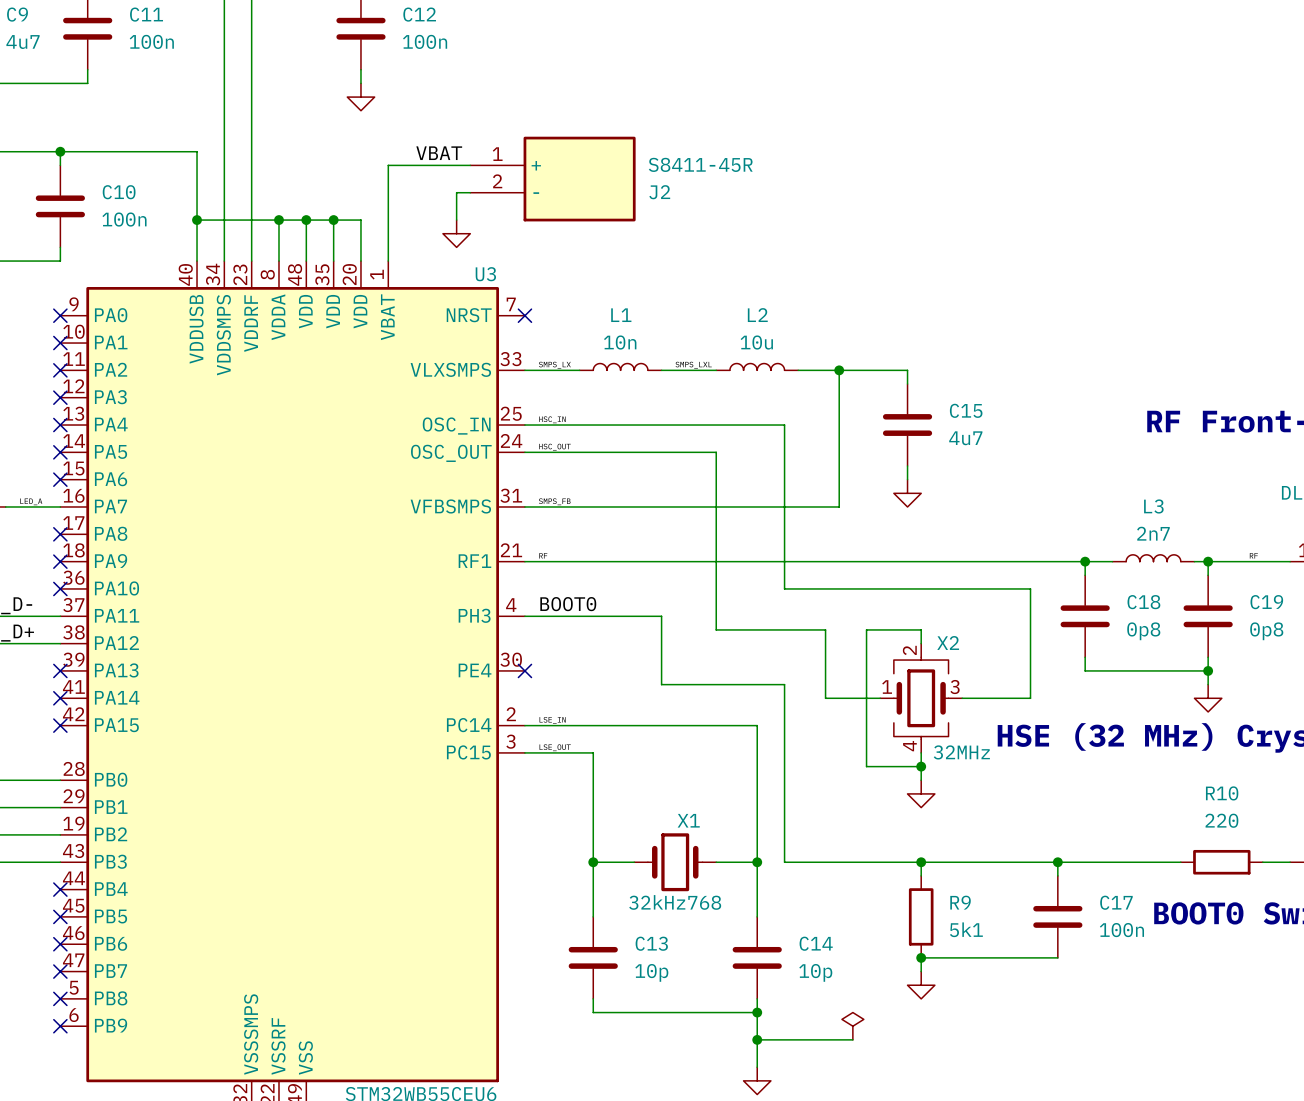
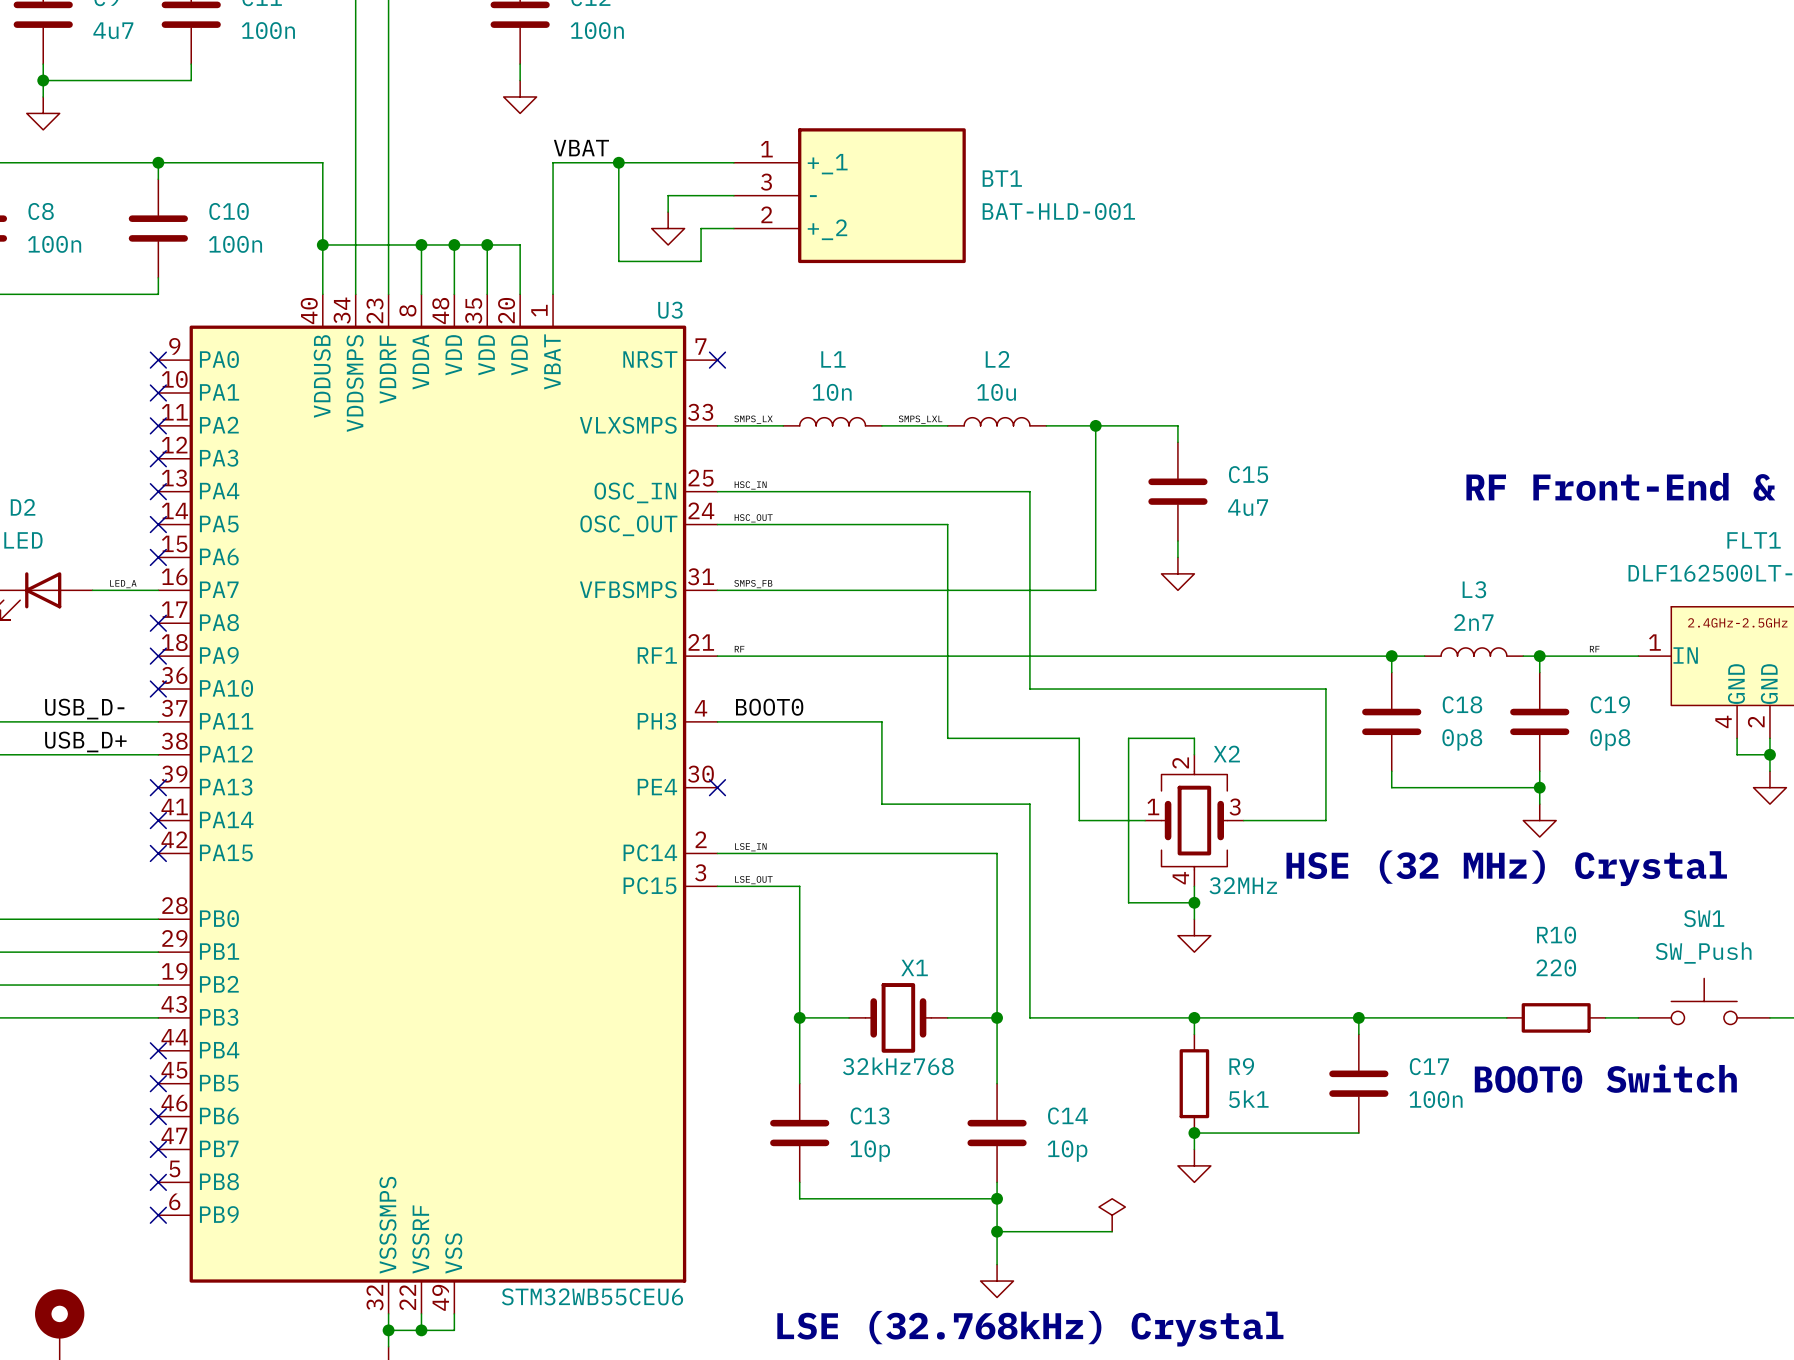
wire: none -> (618, 162) (618, 261) (701, 261) (701, 228) (733, 228)
junction: none -> (618, 162)
label position: VBAT (439, 153) -> VBAT (581, 148)
wire: (388, 165) (470, 165) -> (553, 179) (553, 162) (733, 162)
wire: none -> (733, 195) (668, 195) (668, 212)
J2: S8411-45R (552, 179) -> none
BT1: none -> BAT-HLD-001 (849, 195)
wire: (470, 192) (456, 192) (456, 220) -> none
power symbol position: (456, 233) -> (668, 228)

